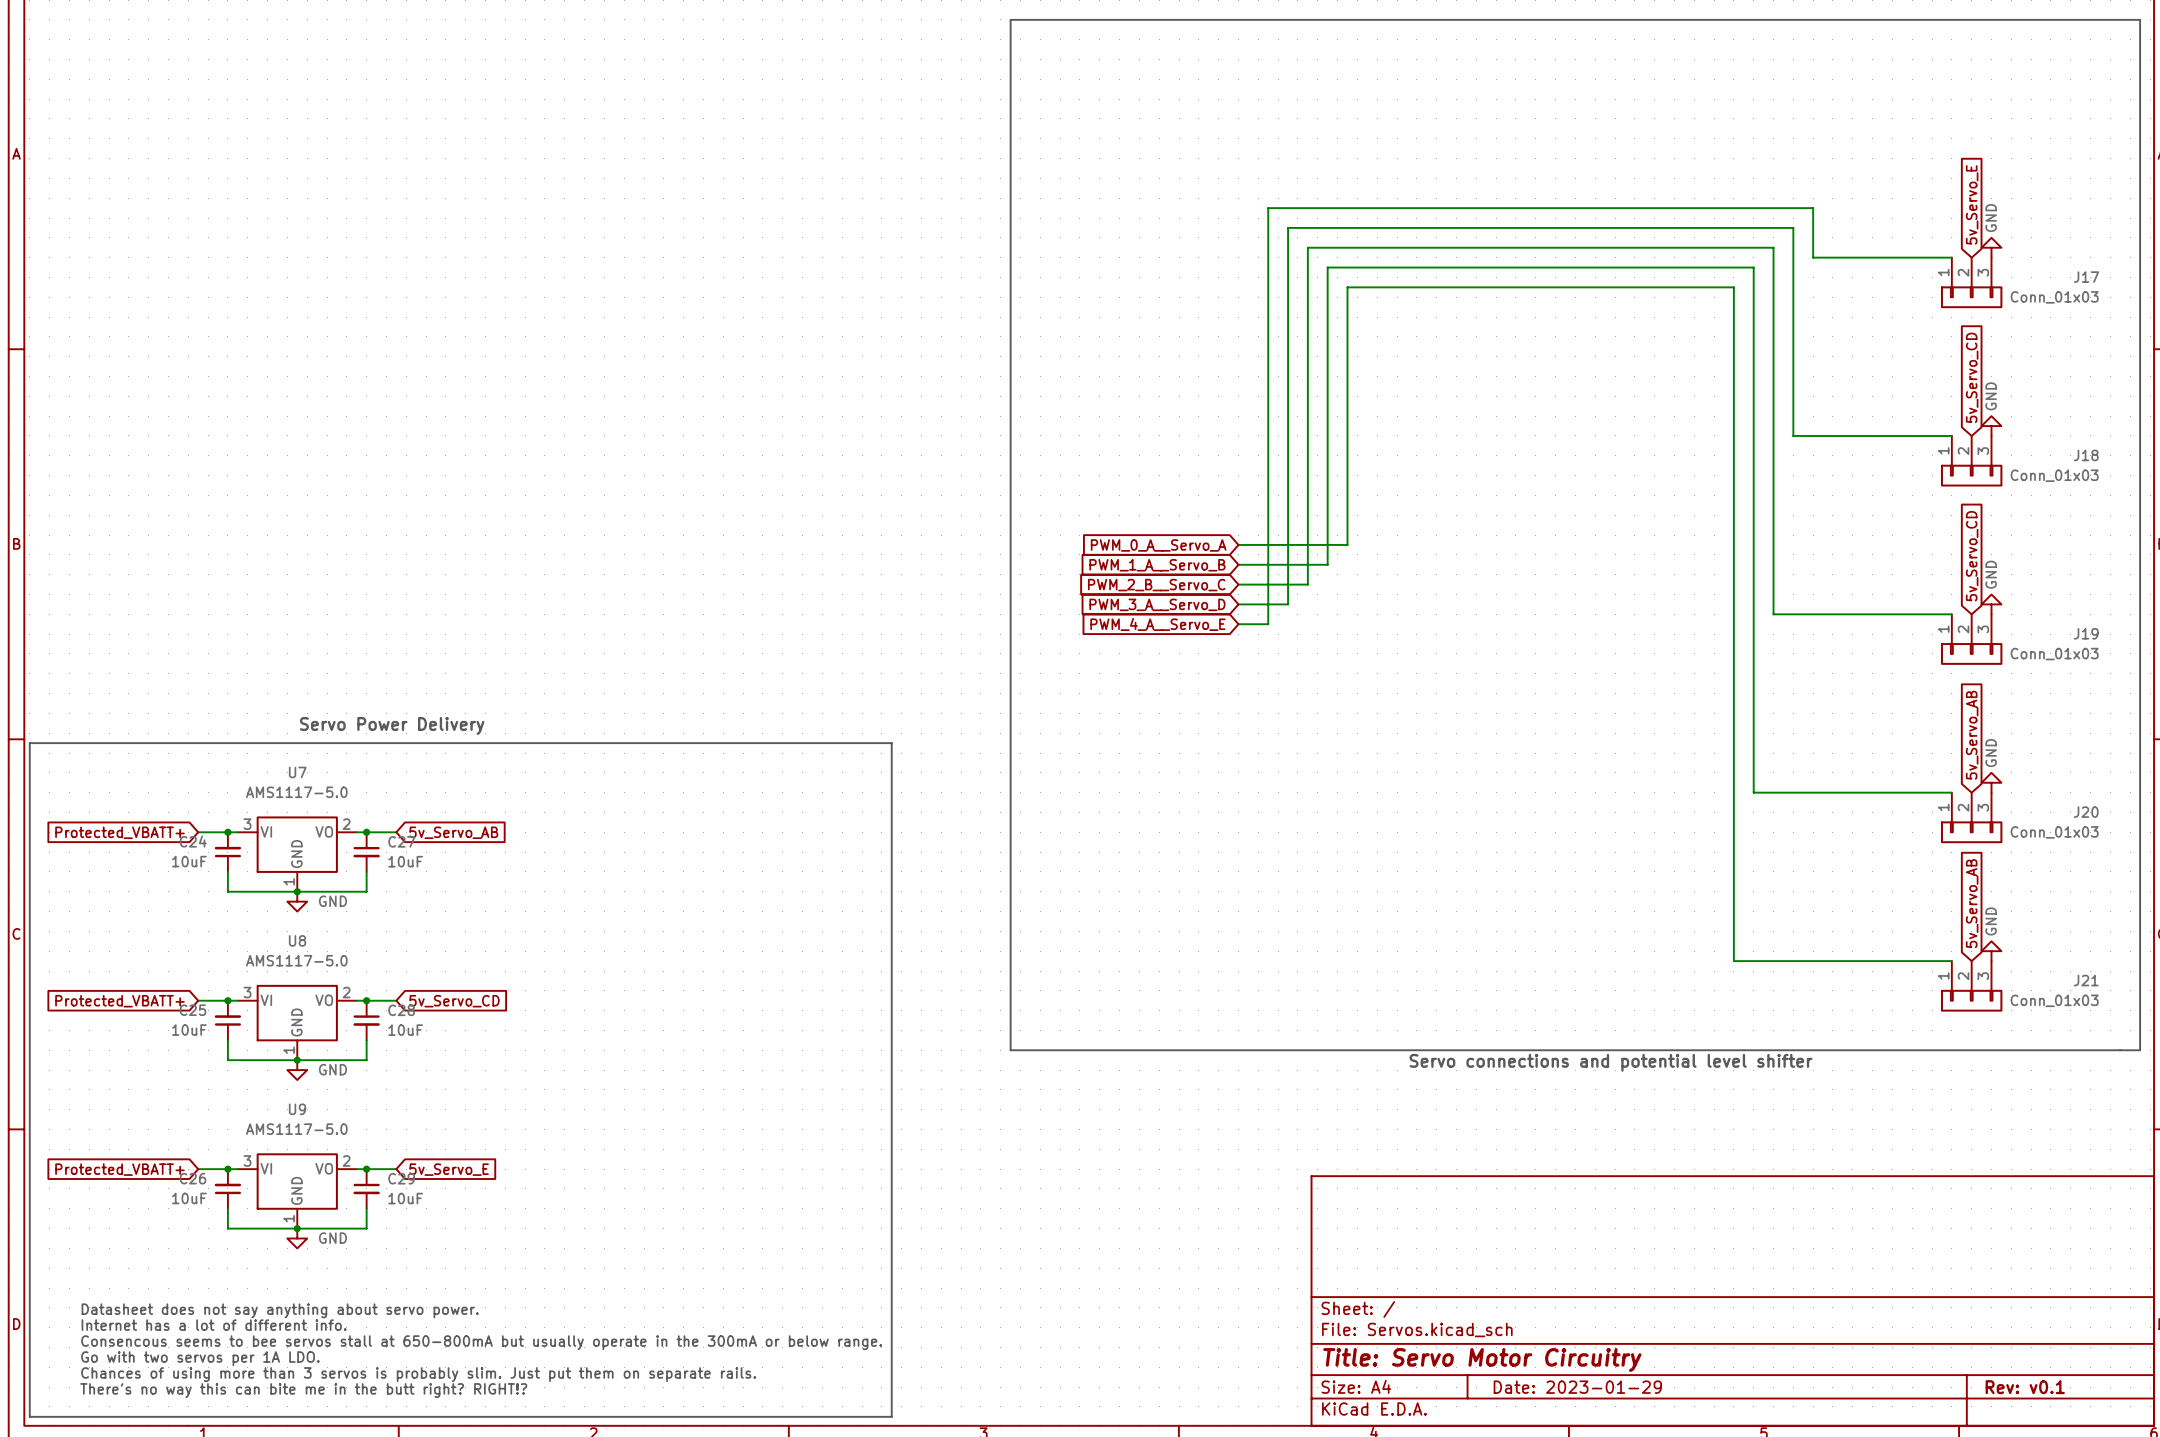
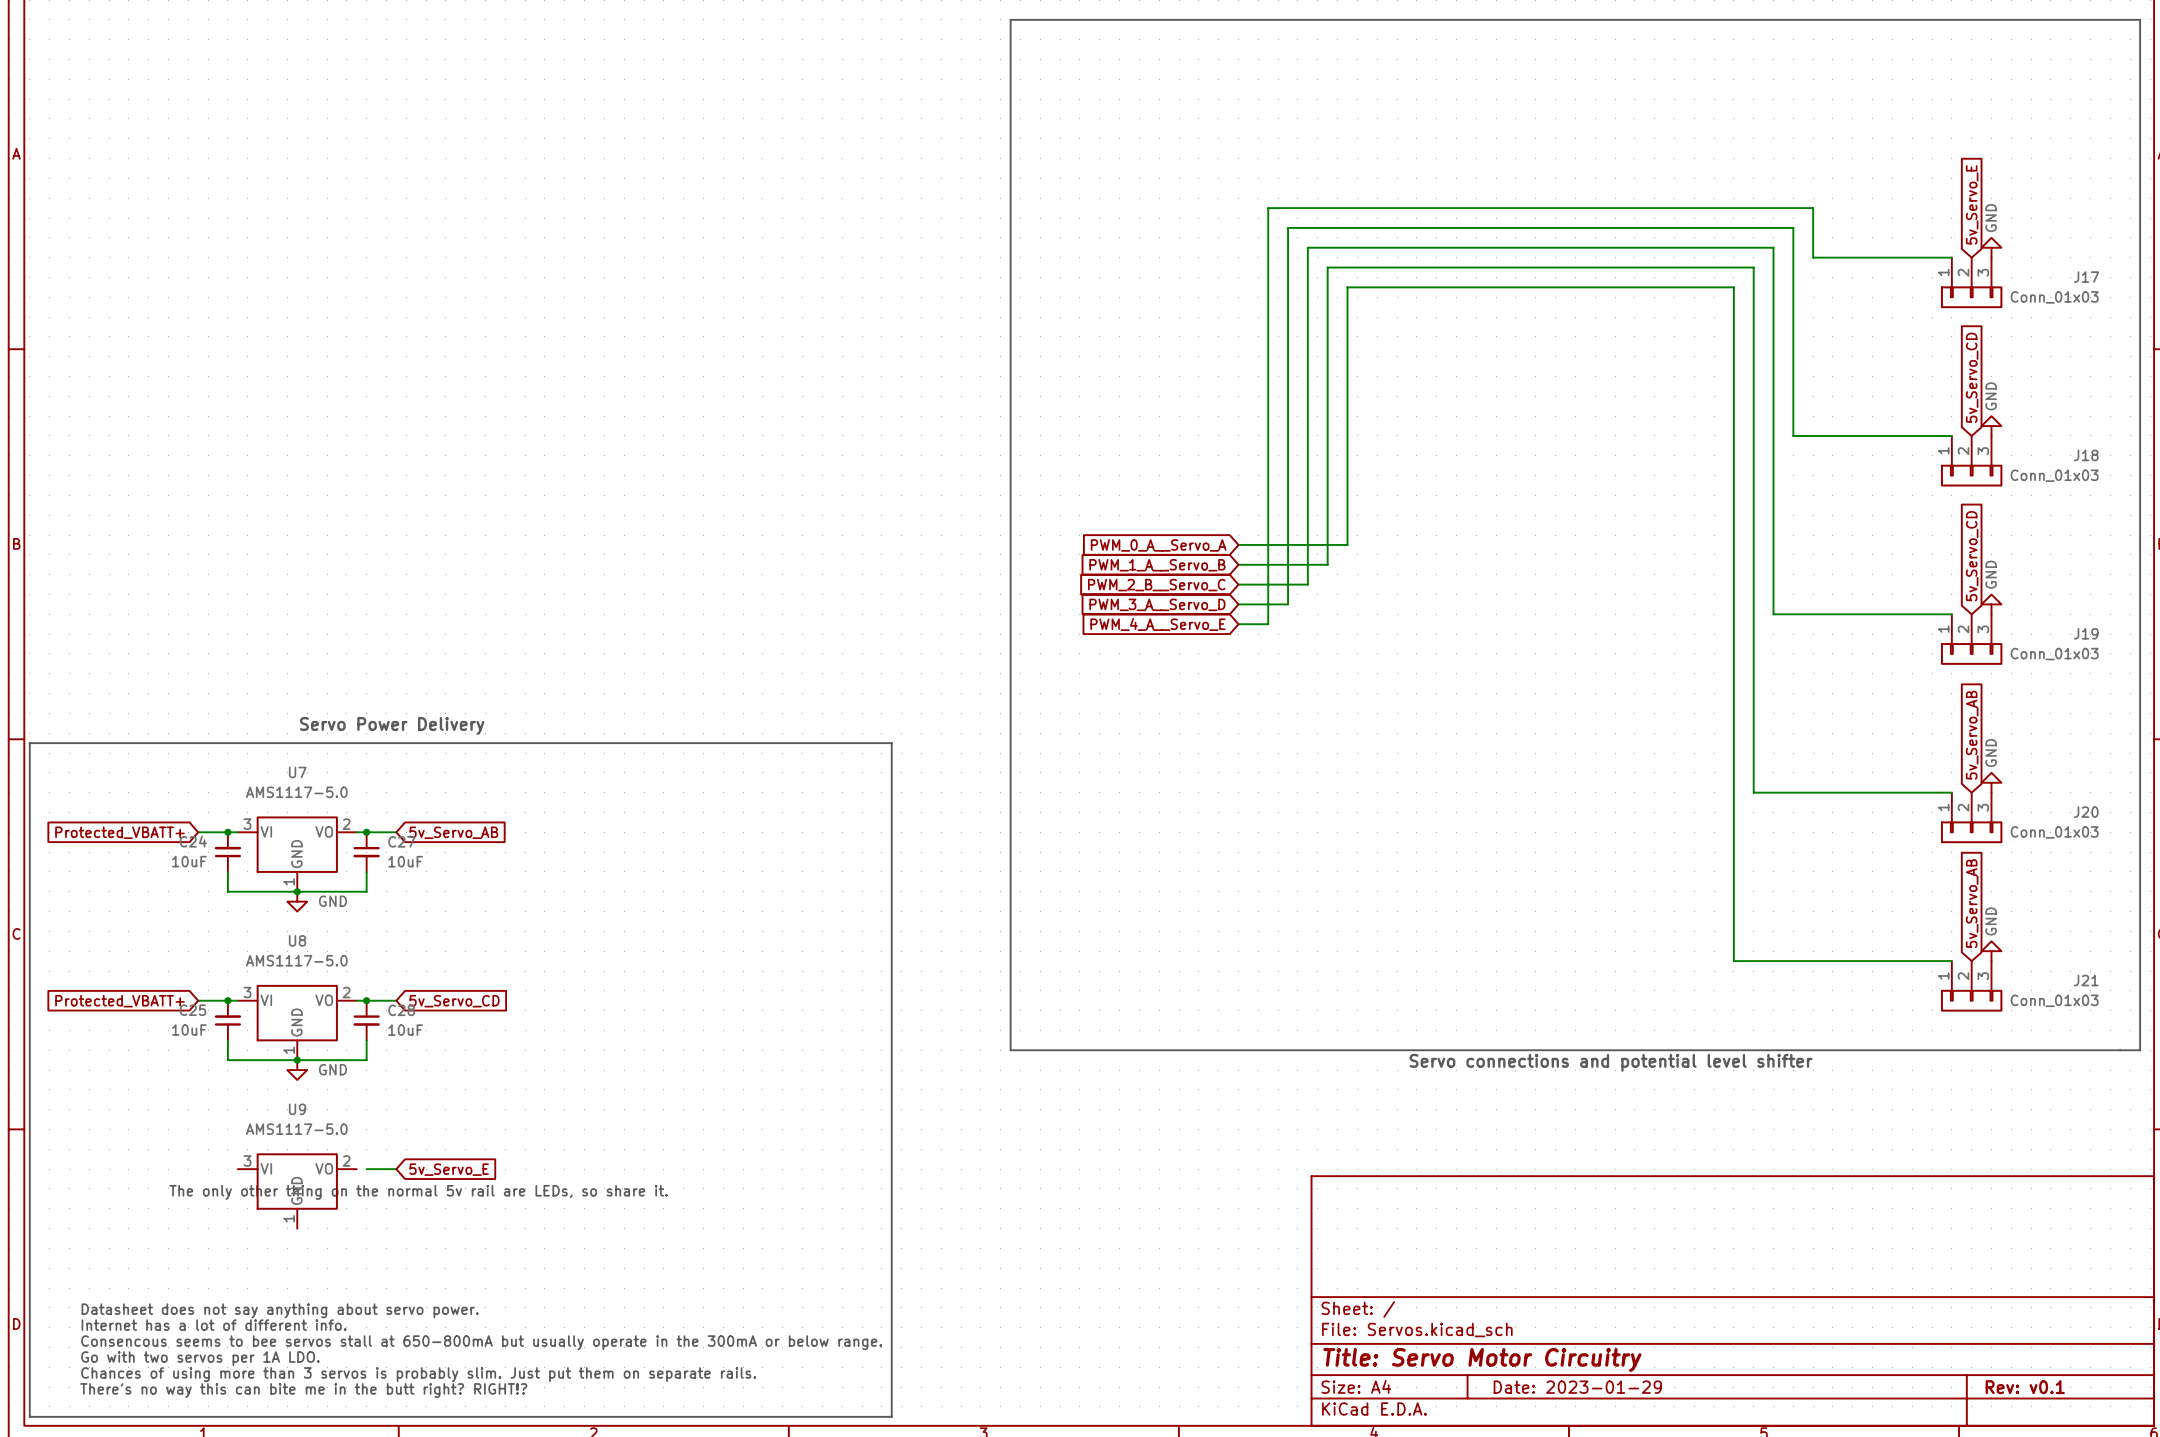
global label: Protected_VBATT+ (119, 1169) -> none
wire: (198, 1169) (237, 1169) -> none
junction: (227, 1169) -> none
wire: (356, 1169) (366, 1169) -> none
junction: (366, 1169) -> none
C26: 10uF (227, 1188) -> none
C29: 10uF (366, 1188) -> none
text: none -> The only other thing on the normal 5v rail are LEDs, so share it. (418, 1192)
wire: (227, 1208) (227, 1228) (366, 1228) (366, 1208) -> none
junction: (297, 1228) -> none
power symbol: GND (297, 1238) -> none

